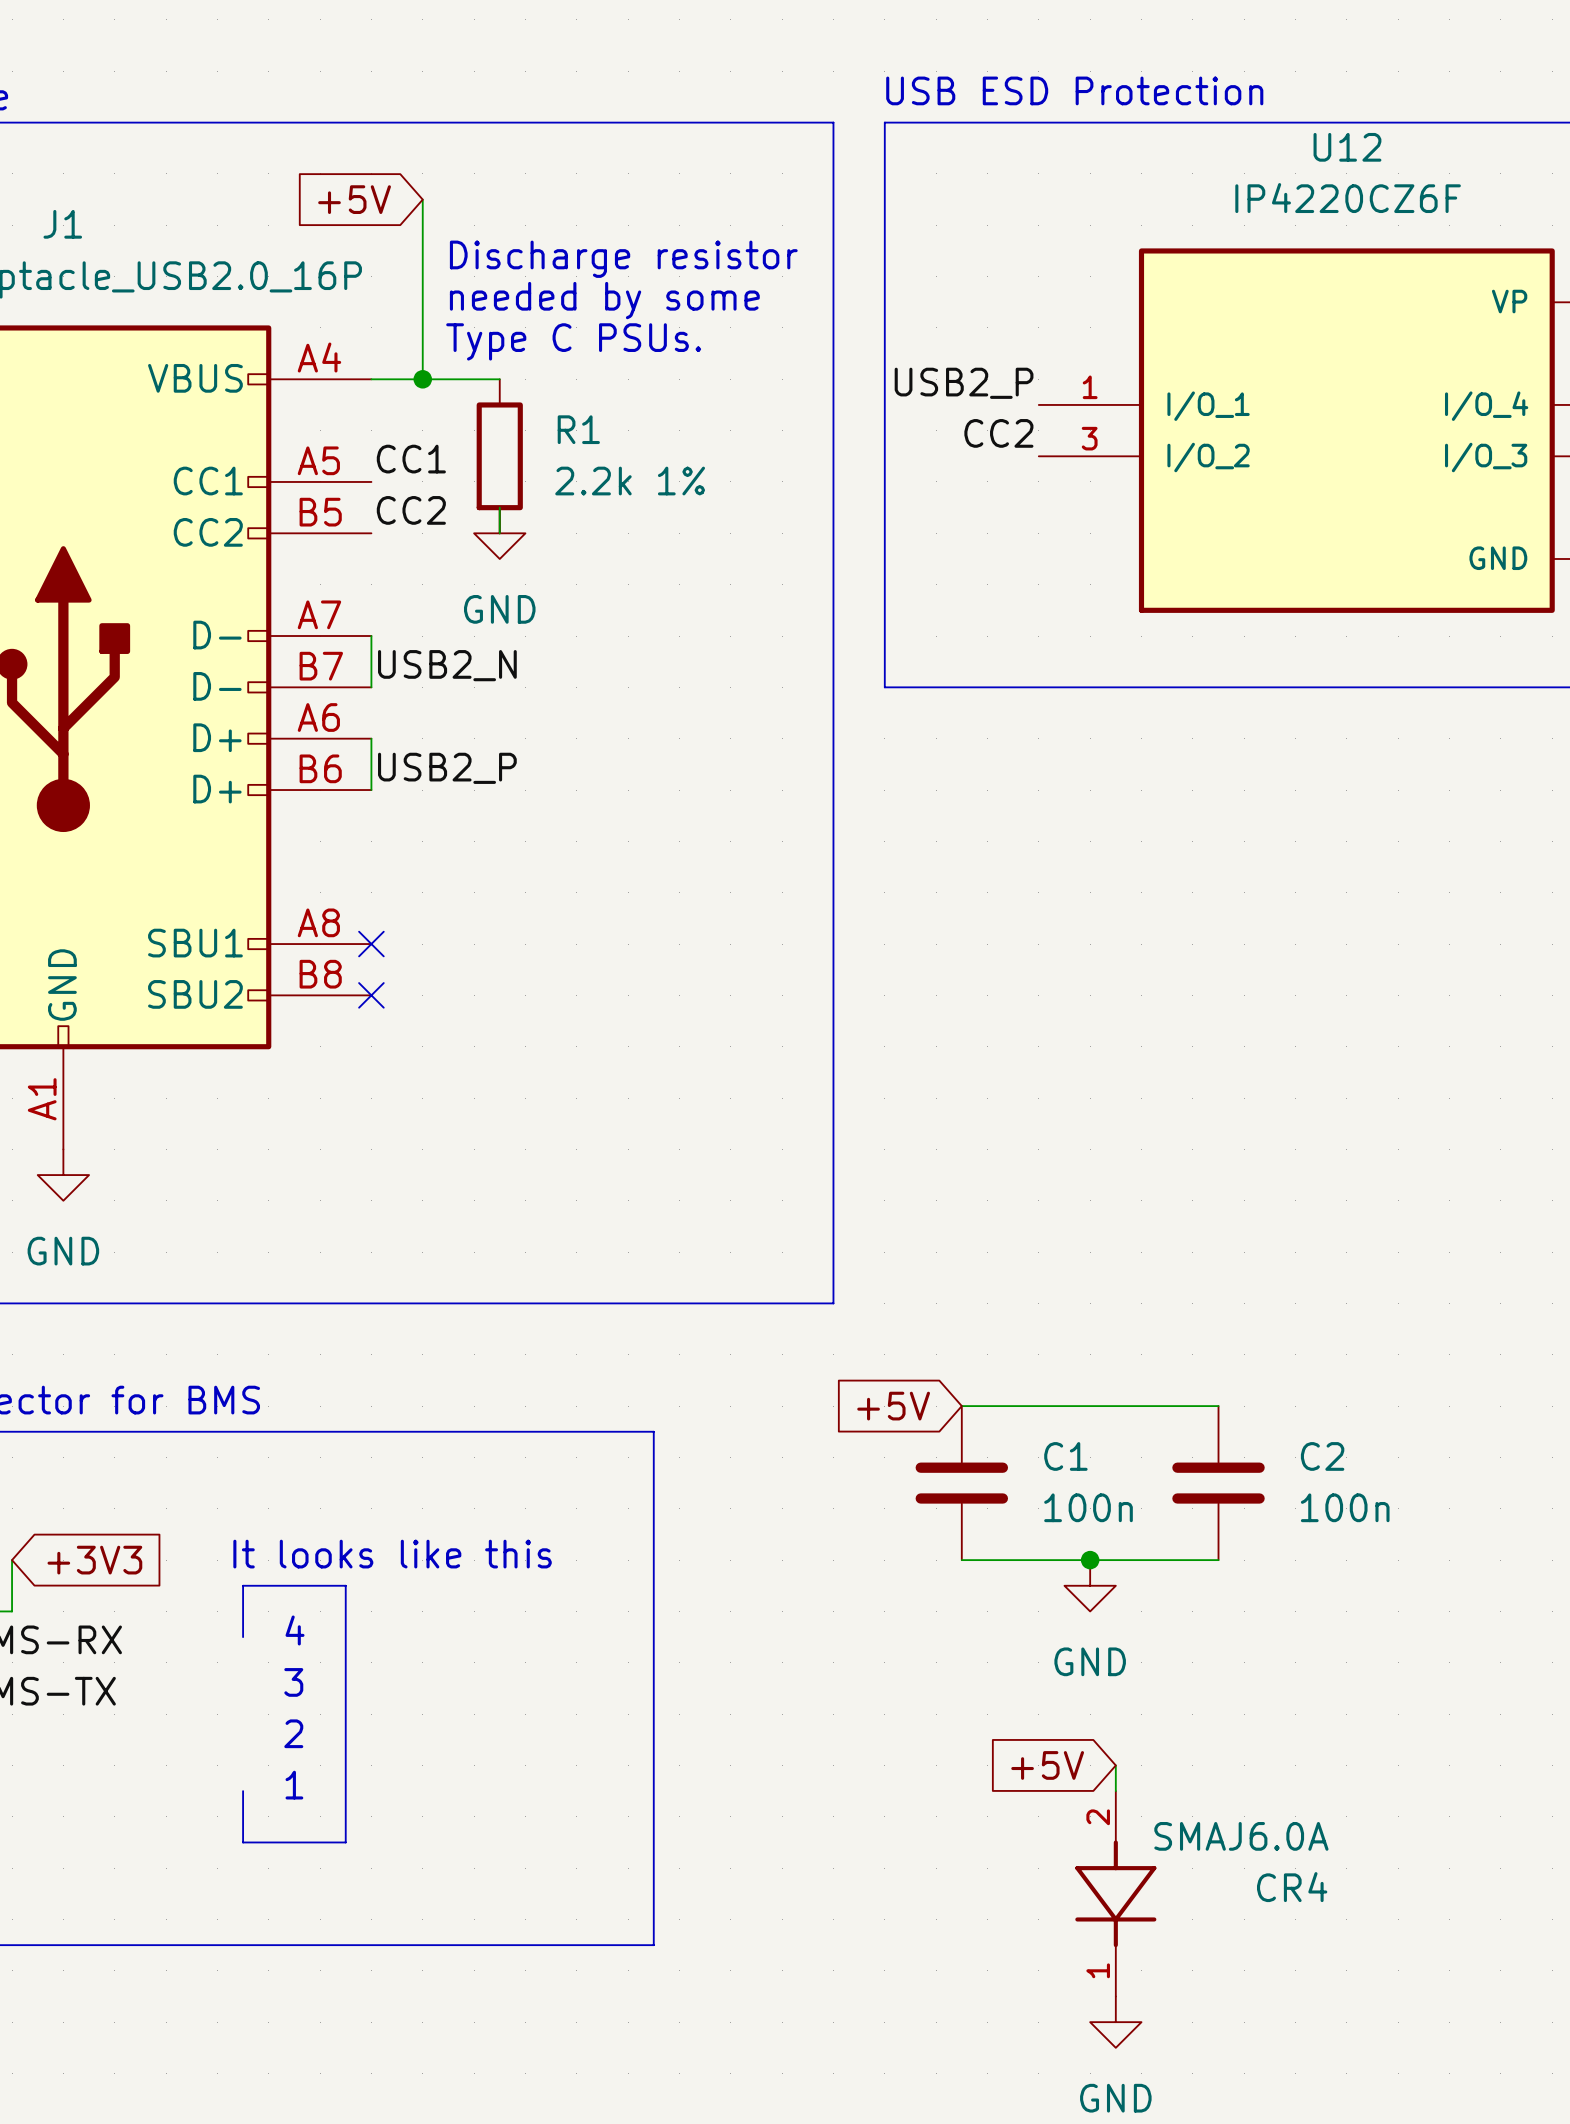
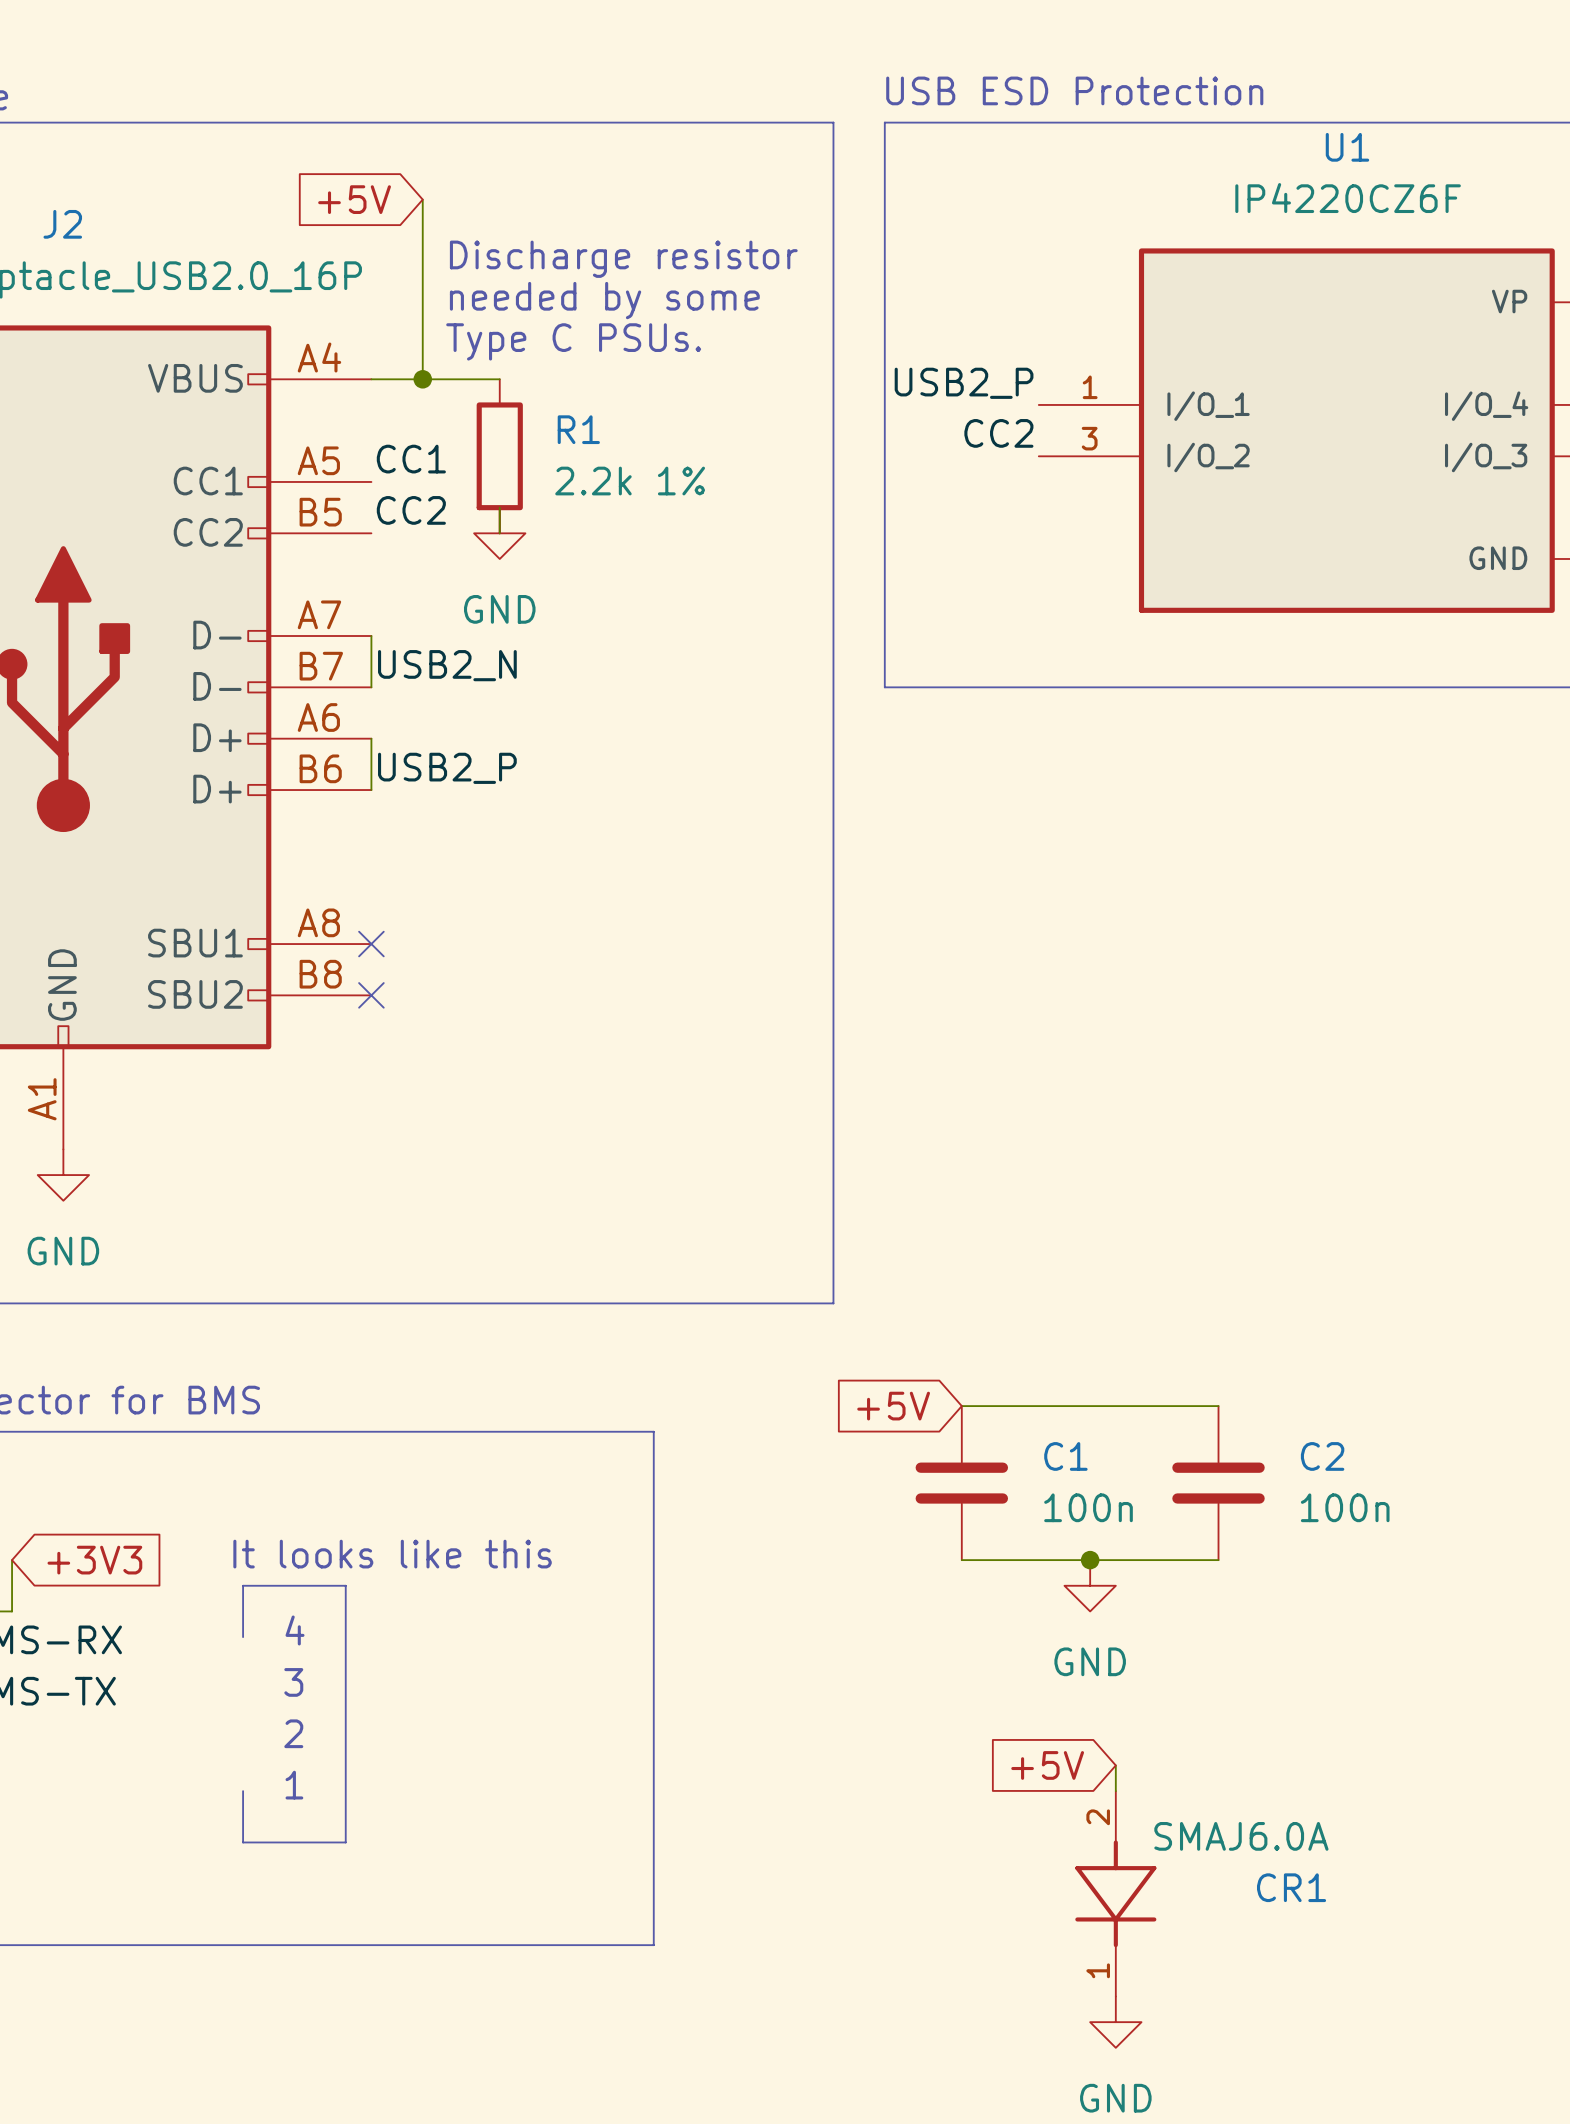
U12 name: U12 (1347, 147) -> U1 (1347, 147)
J1 name: J1 (62, 224) -> J2 (62, 224)
CR4 name: CR4 (1292, 1887) -> CR1 (1291, 1887)

